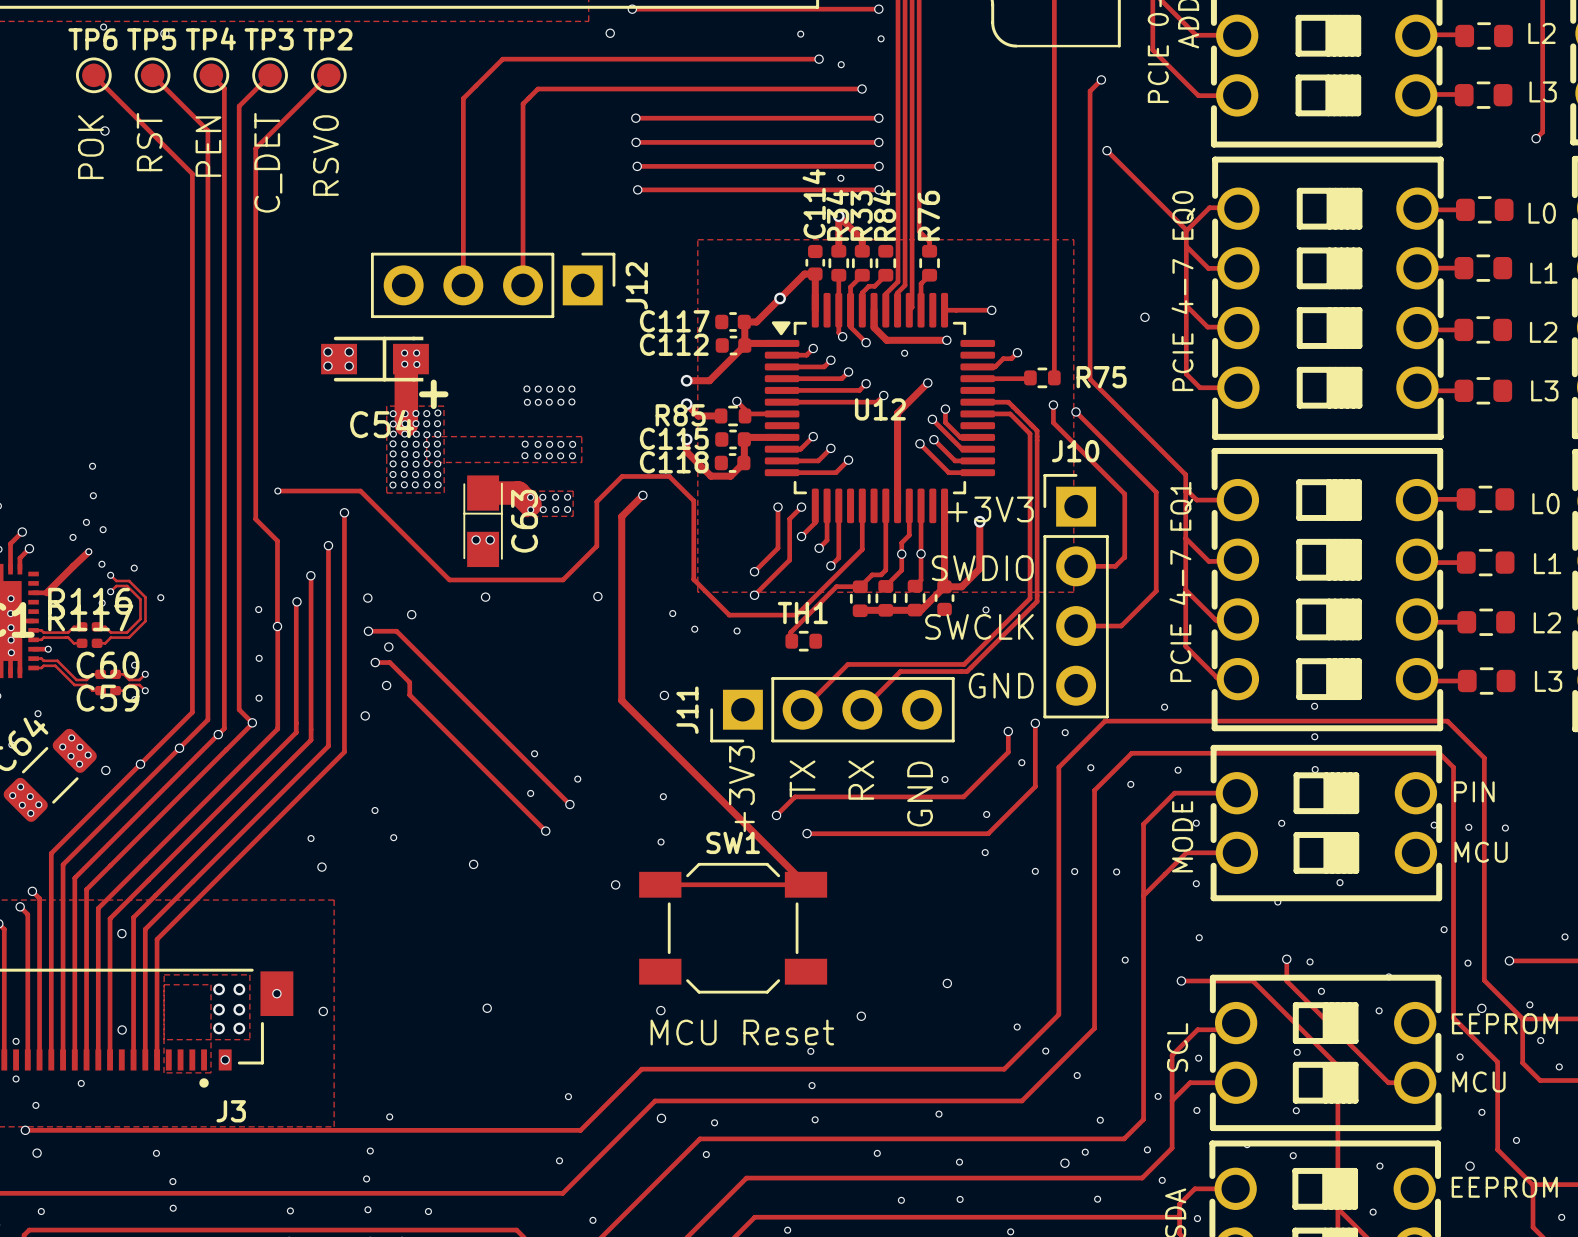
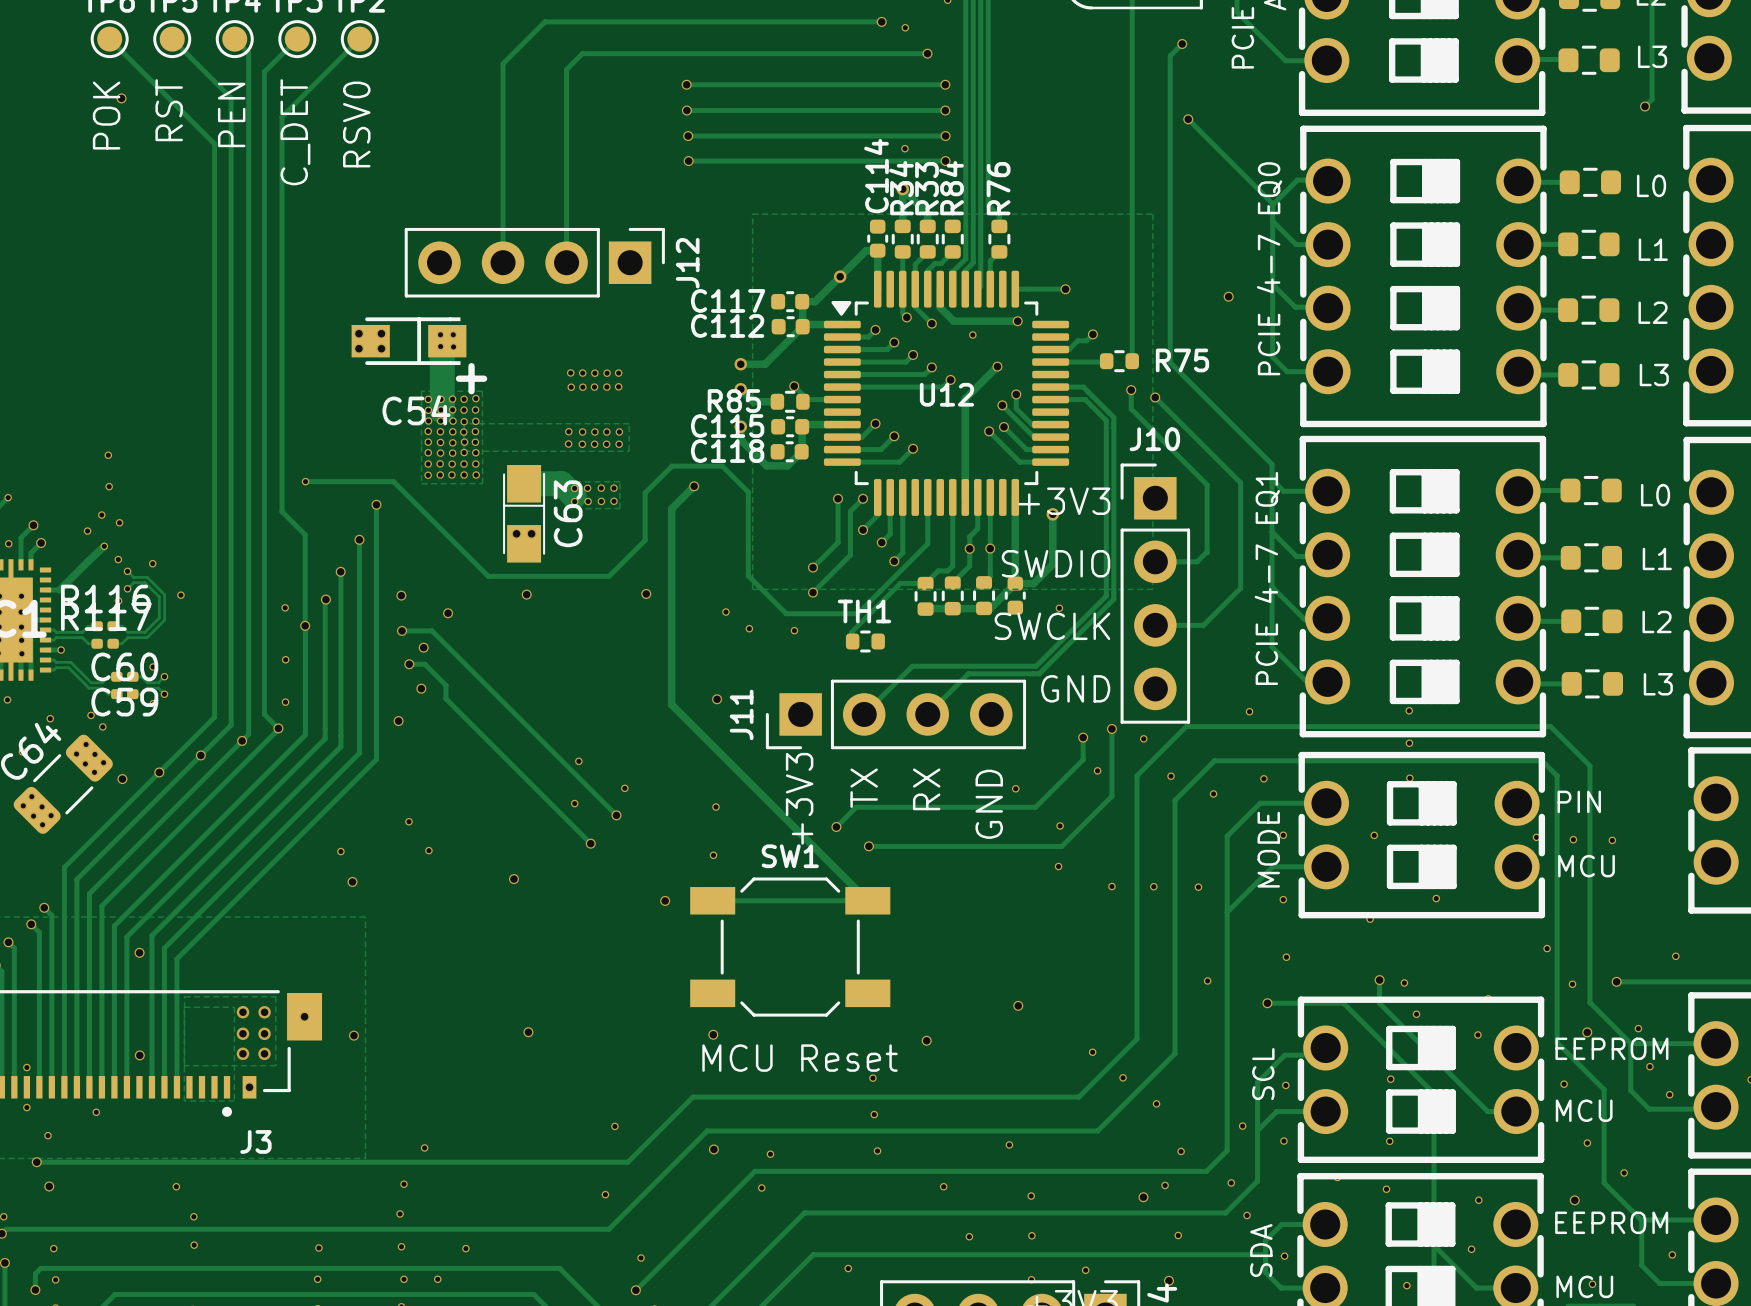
via: none -> (91, 715)
via: none -> (102, 726)

